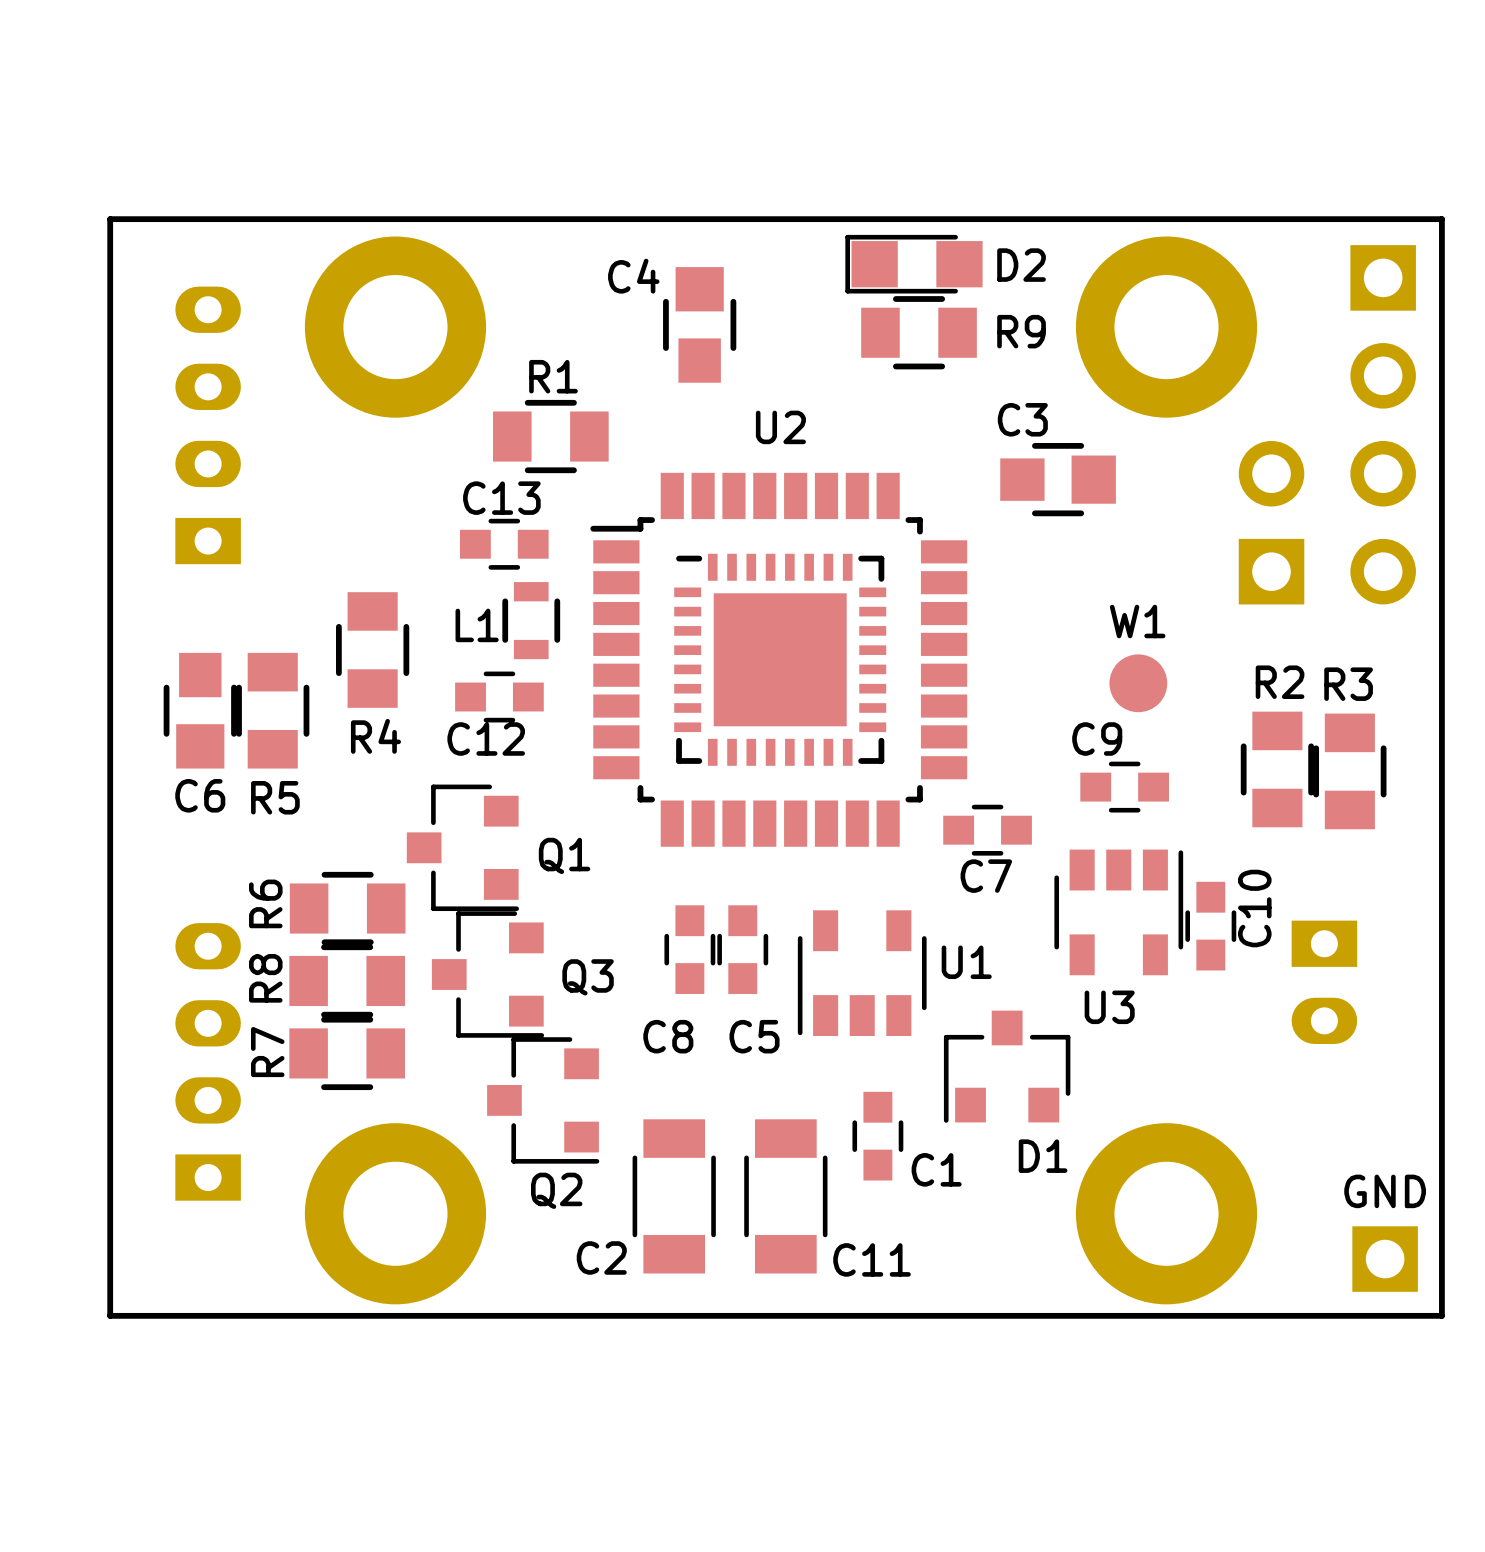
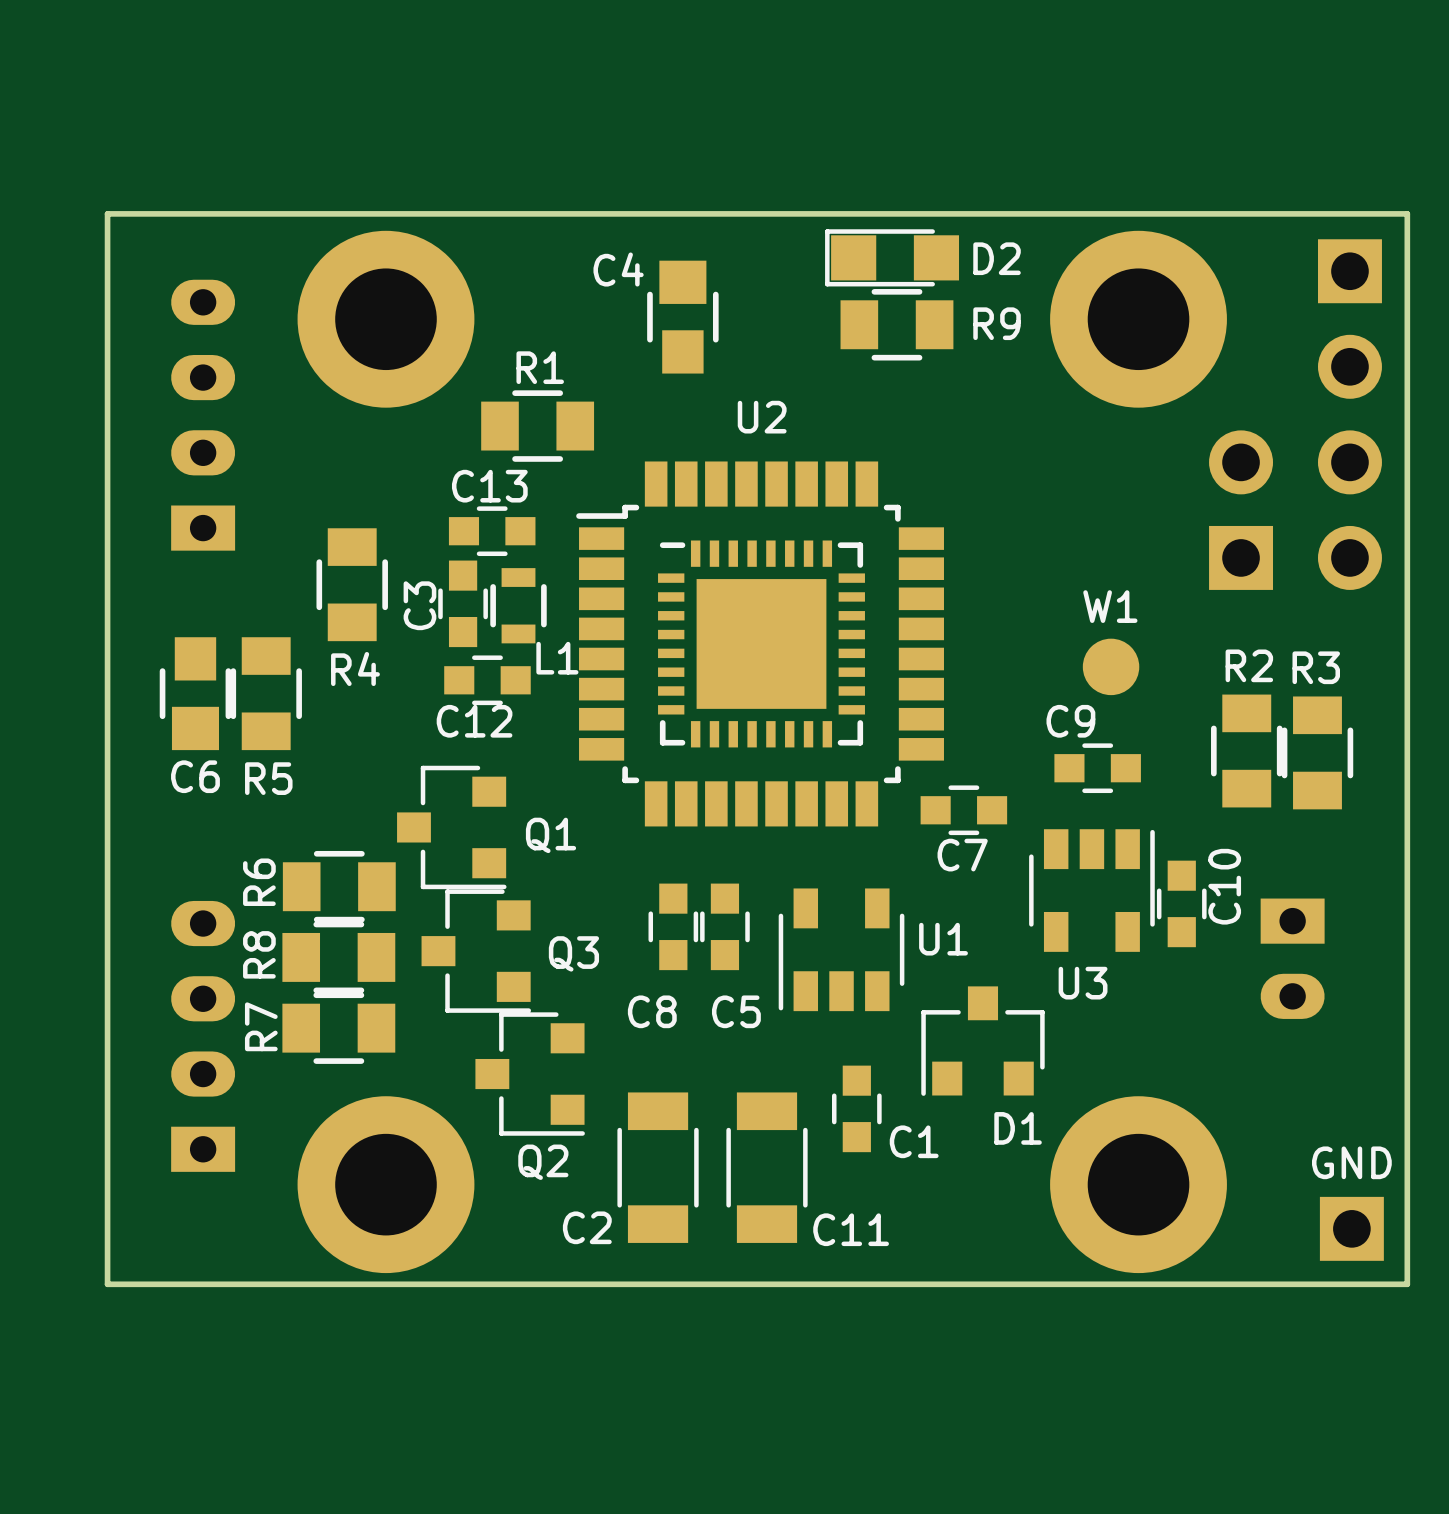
C3 footprint: [1000, 442, 1116, 517] -> [438, 560, 488, 648]
L1 name position: L1 (477, 625) -> L1 (557, 658)
R4 position: (372, 650) -> (352, 584)

